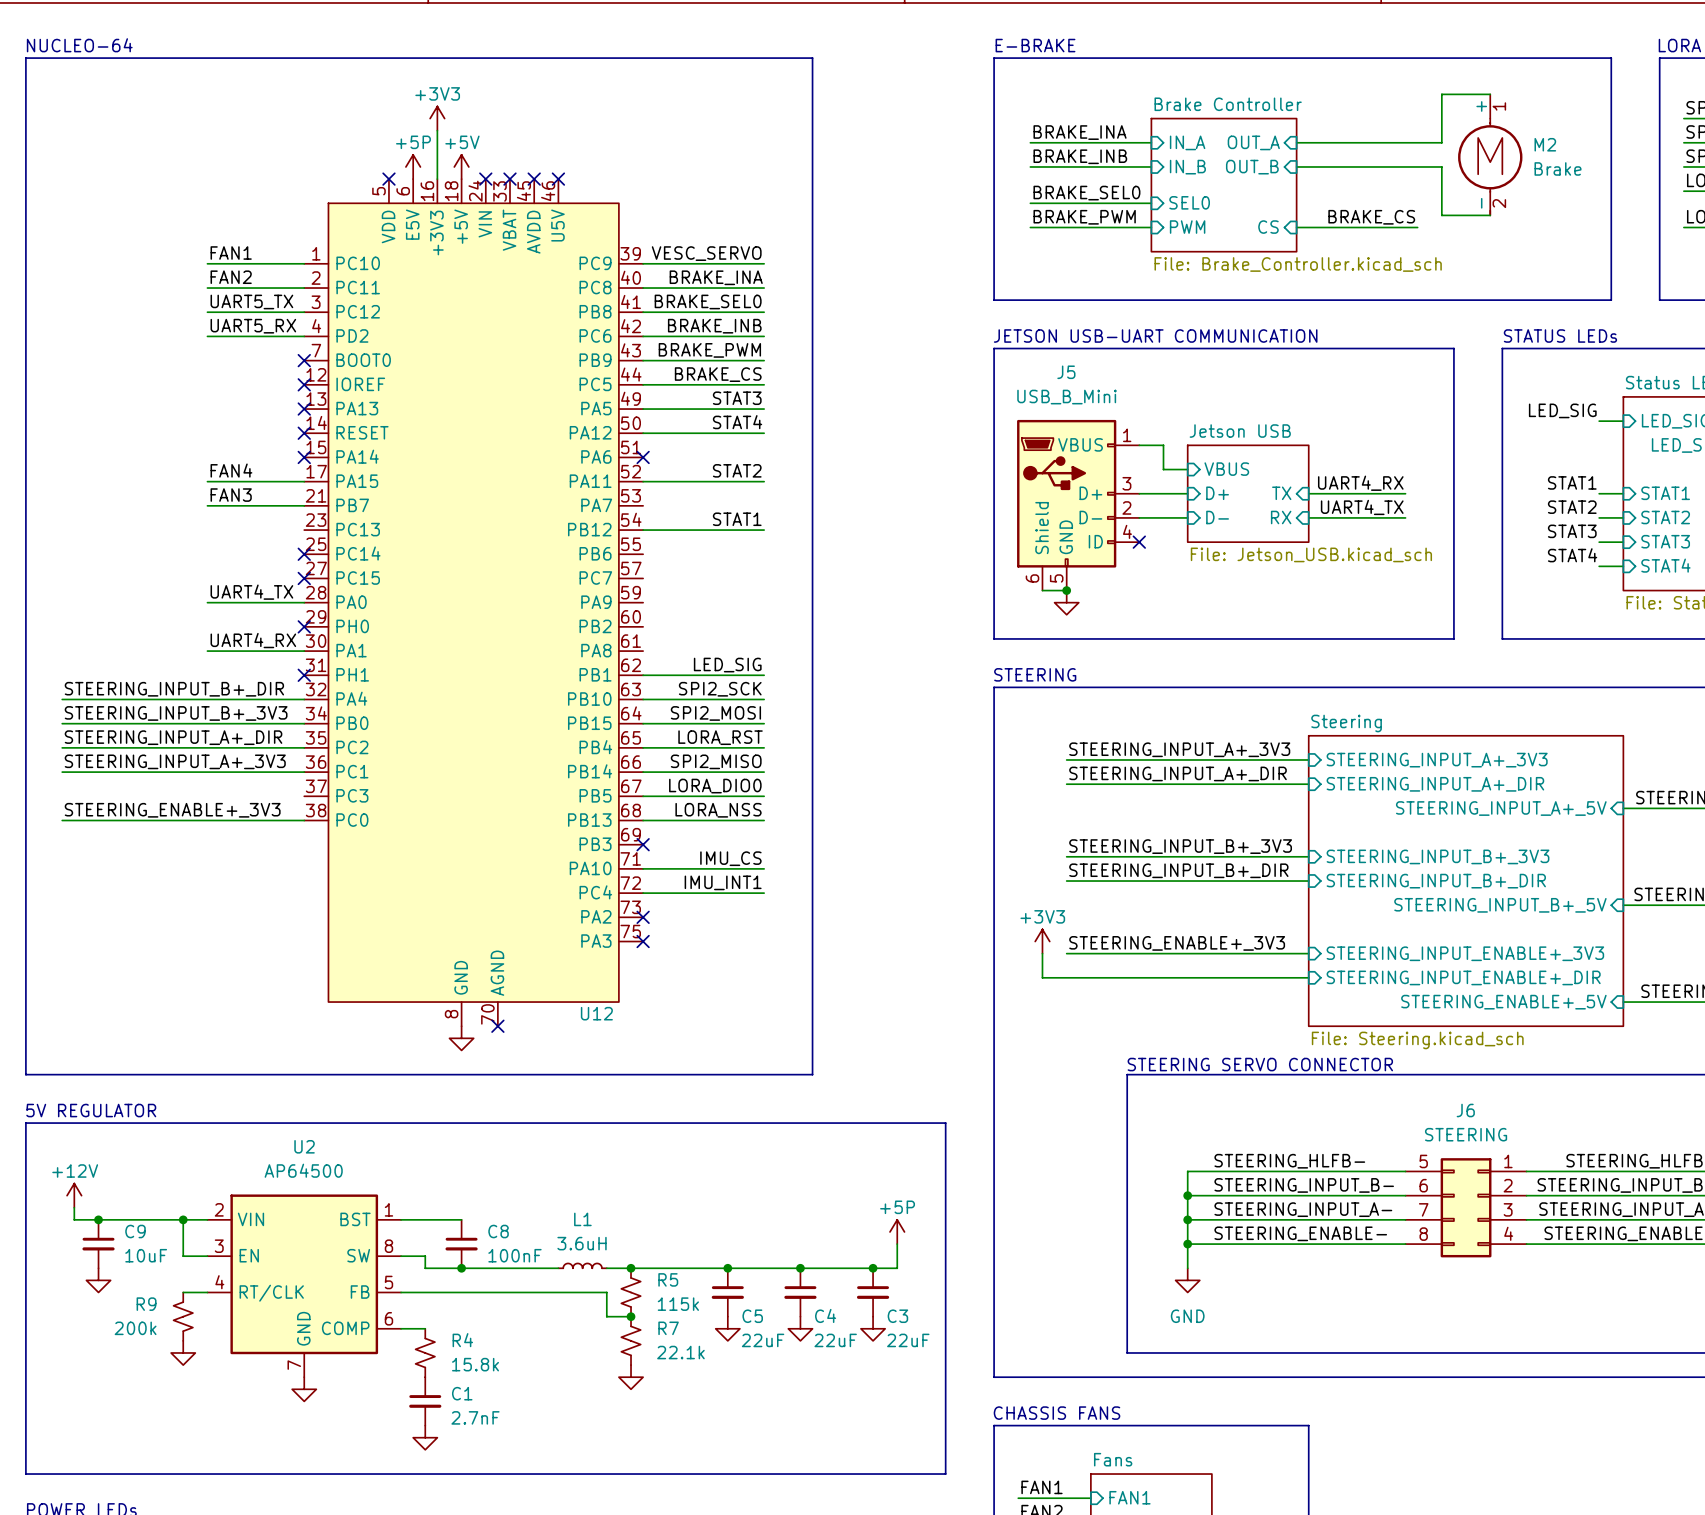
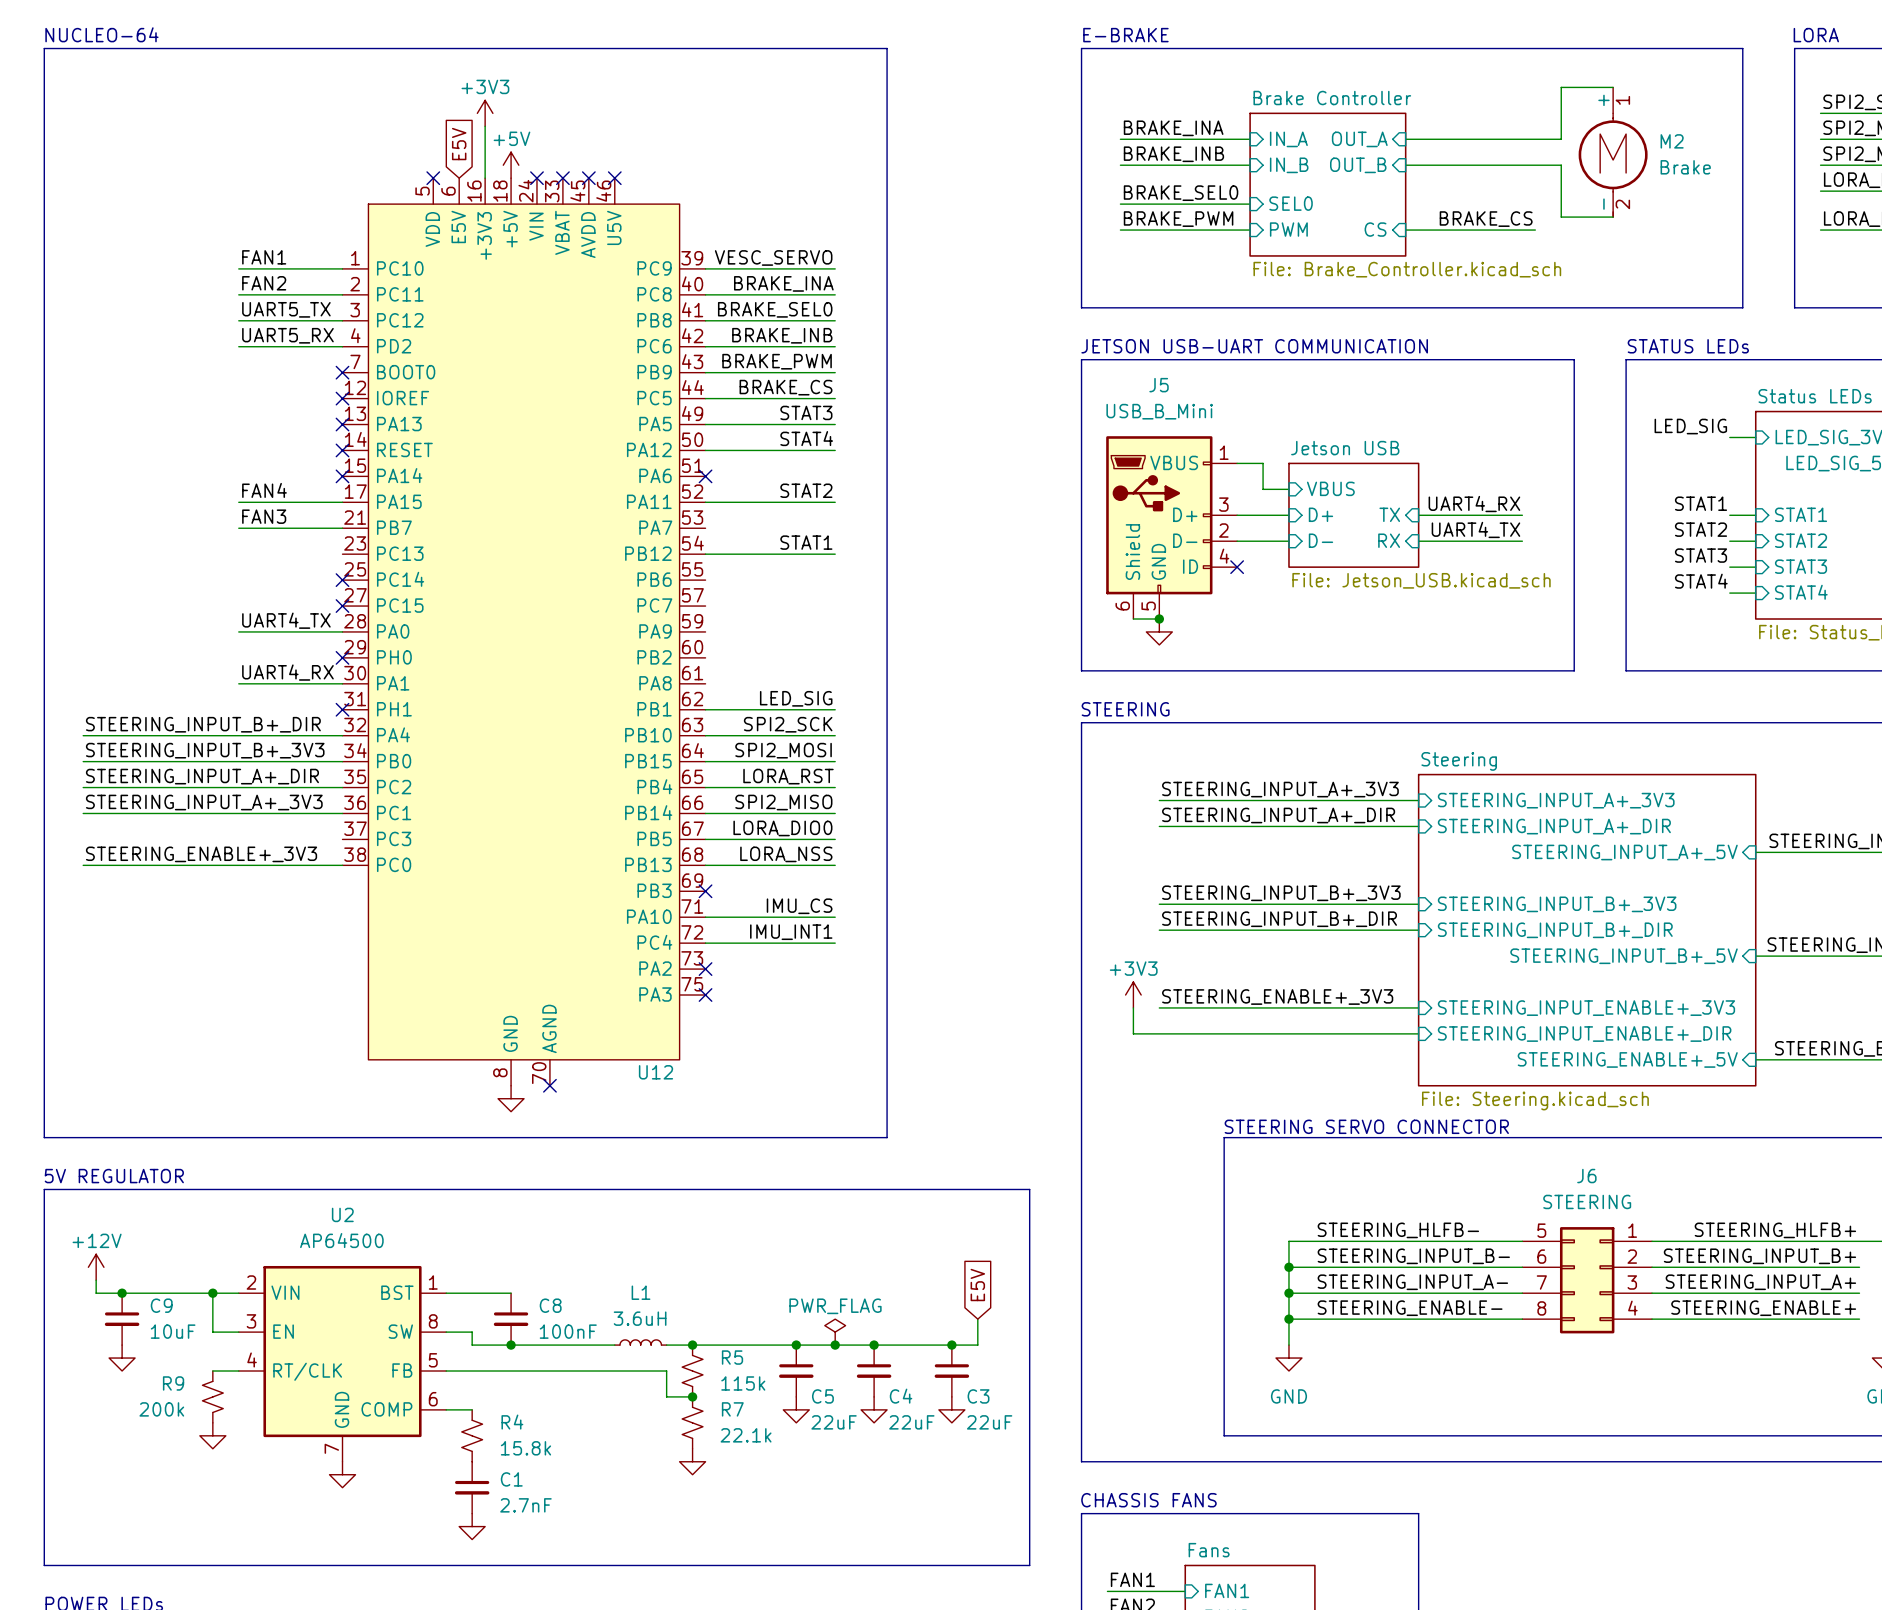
global label: none -> E5V (459, 144)
power symbol: +5P (413, 166) -> none
global label: none -> E5V (977, 1285)
power symbol: +5P (897, 1231) -> none
power symbol: none -> PWR_FLAG (835, 1332)
junction: none -> (835, 1345)

